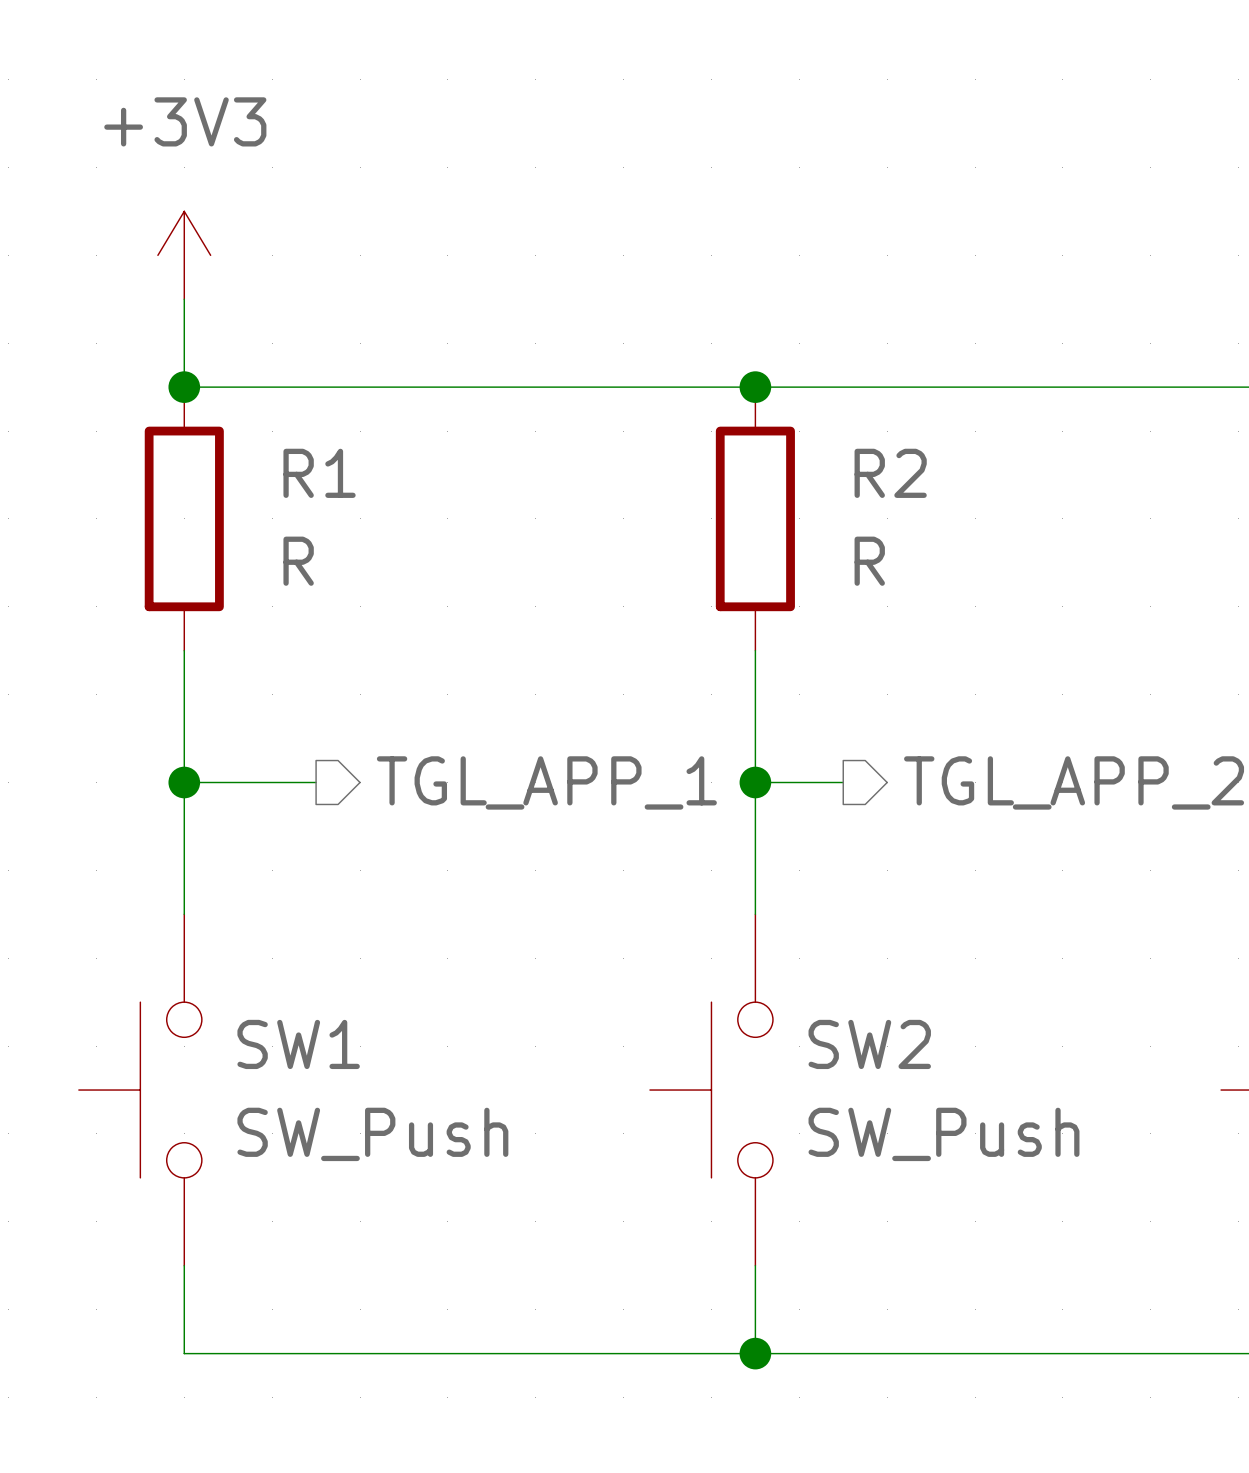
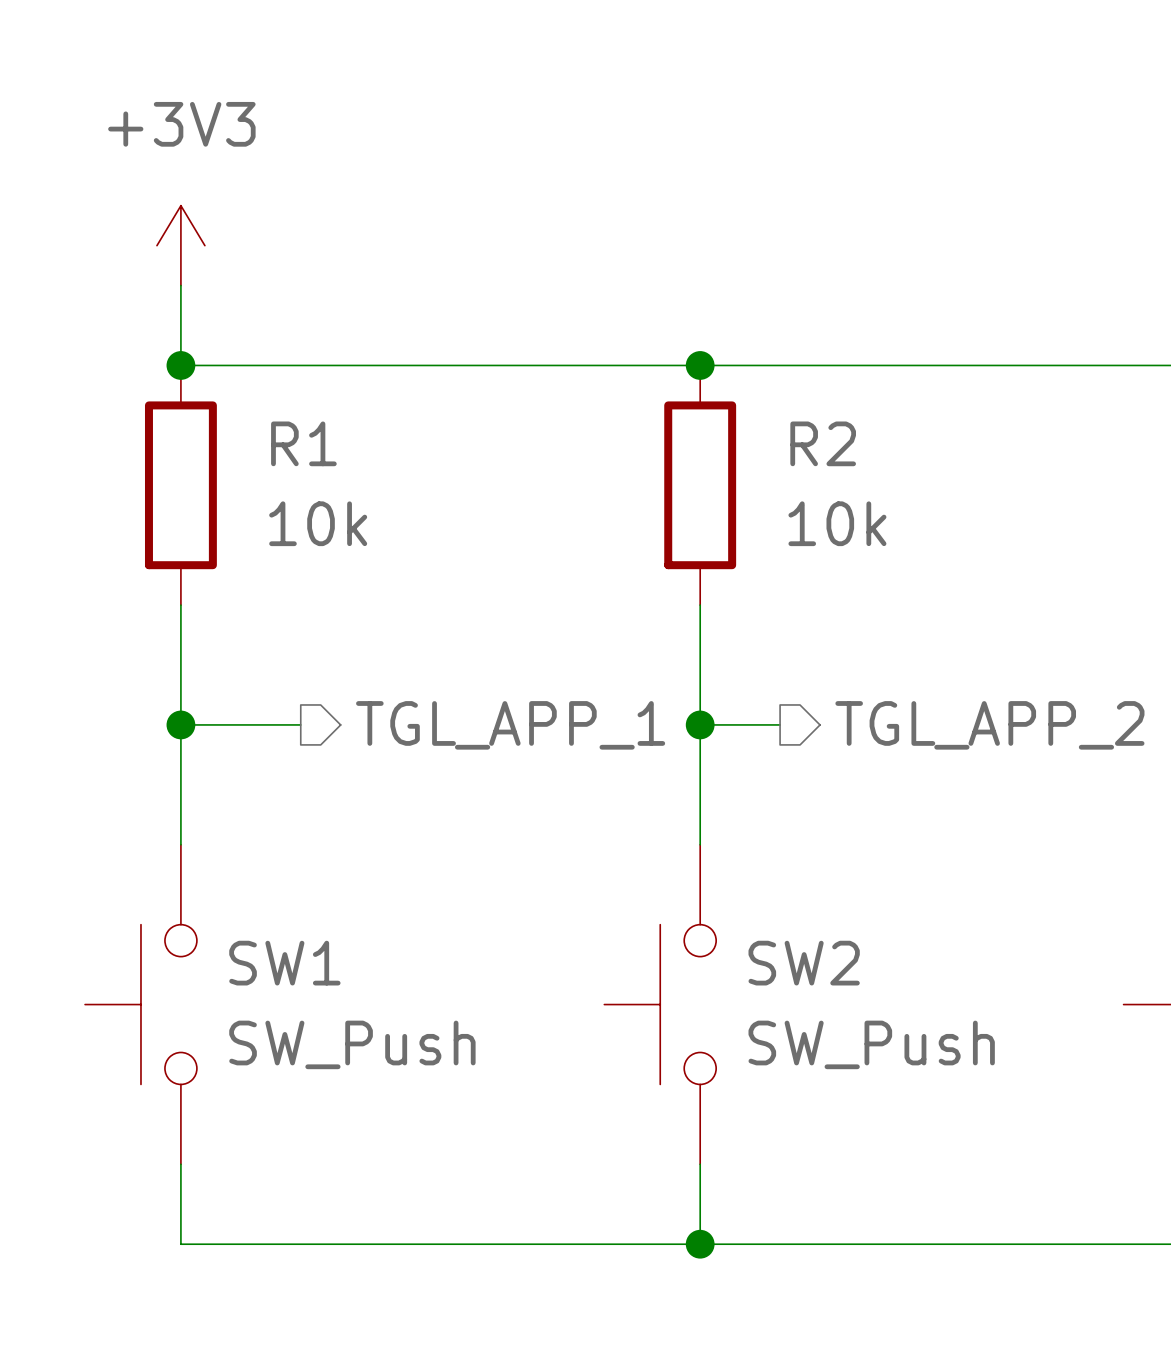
R1 value: R (298, 561) -> 10k (318, 523)
R2 value: R (869, 561) -> 10k (837, 523)

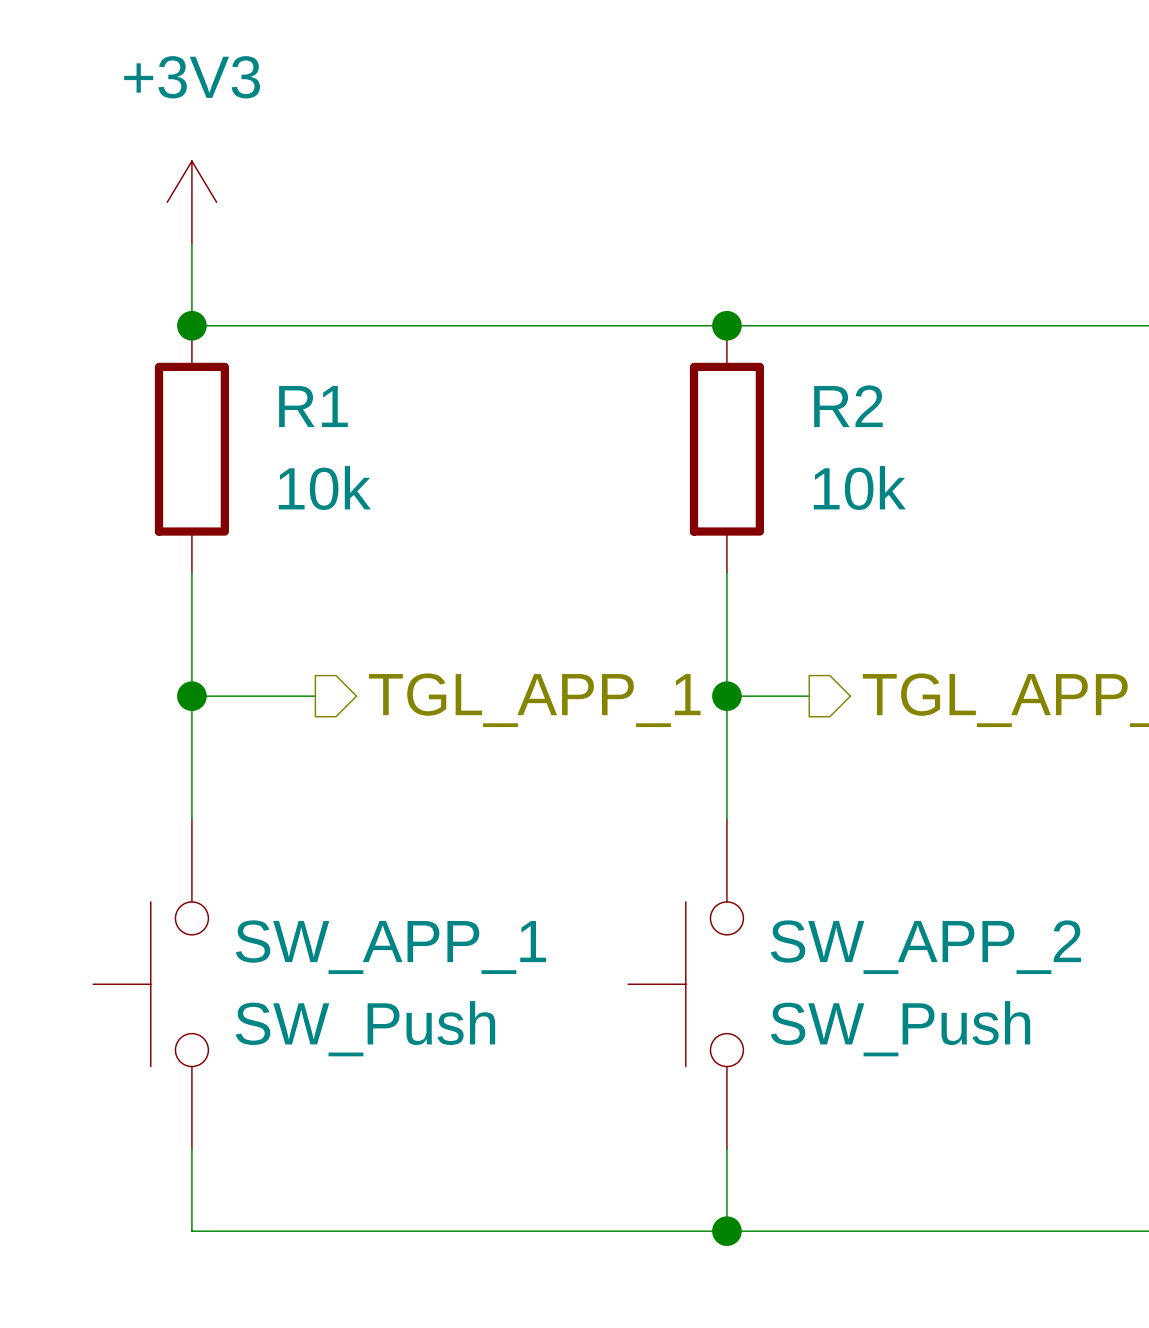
SW1 name: SW1 (284, 963) -> SW_APP_1 (390, 947)
SW2 name: SW2 (804, 963) -> SW_APP_2 (925, 947)

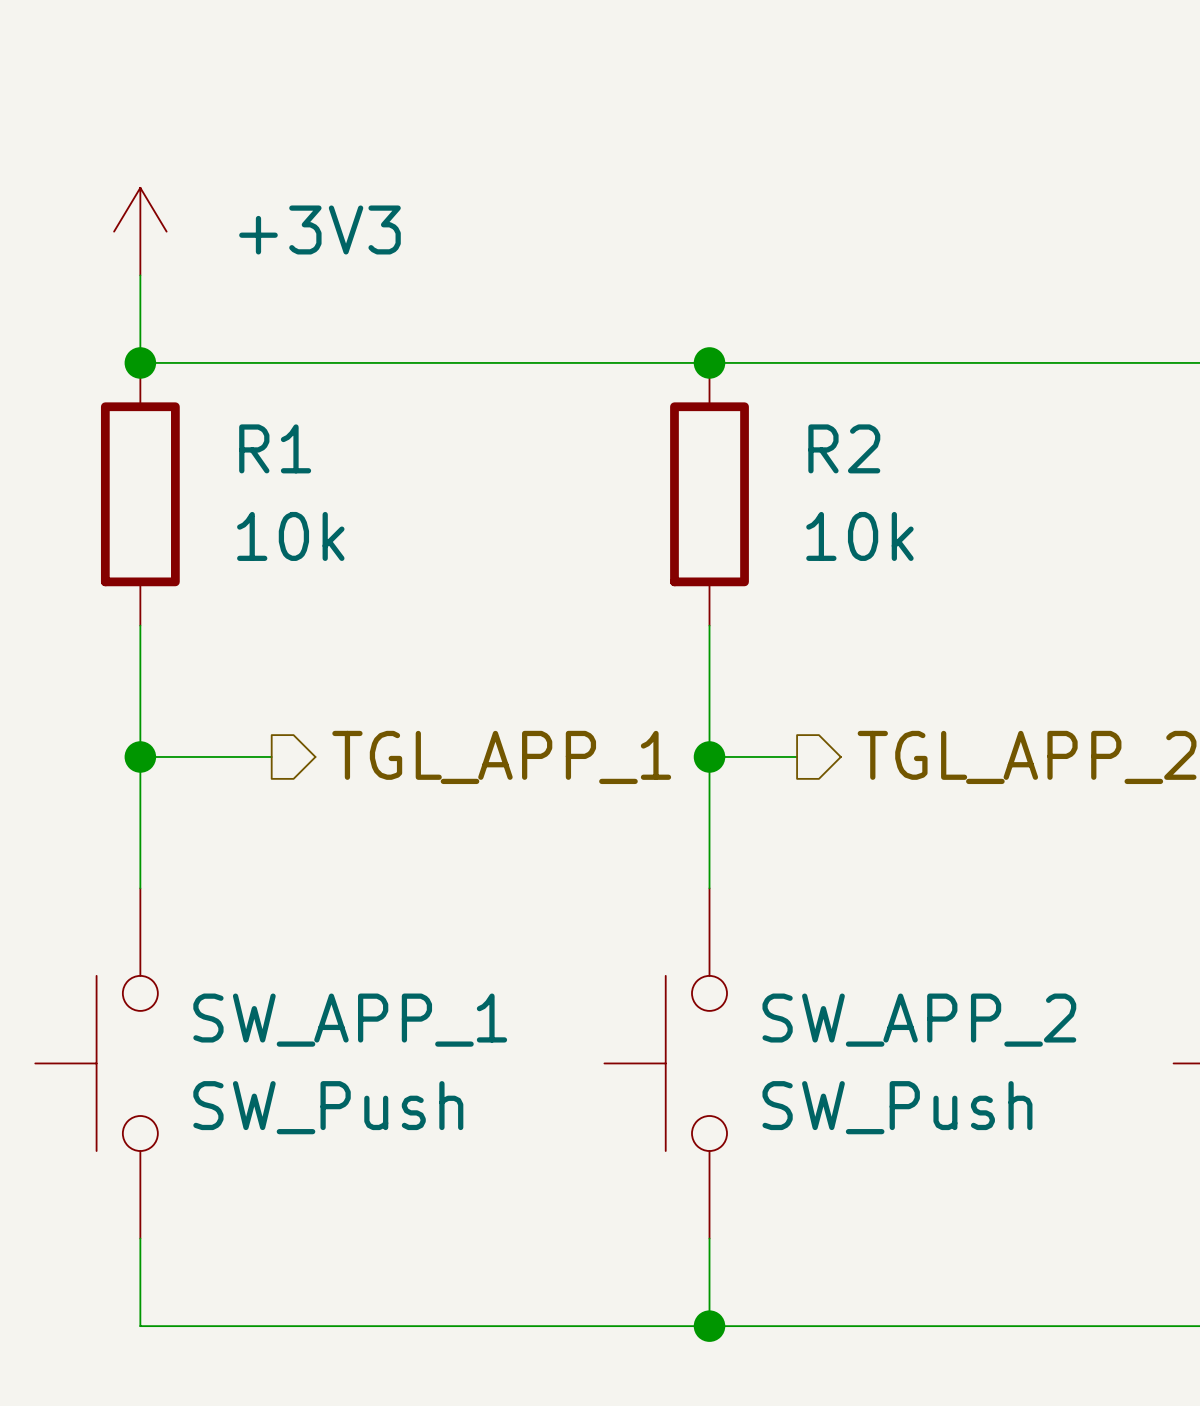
power symbol text position: +3V3 (192, 77) -> +3V3 (319, 229)

